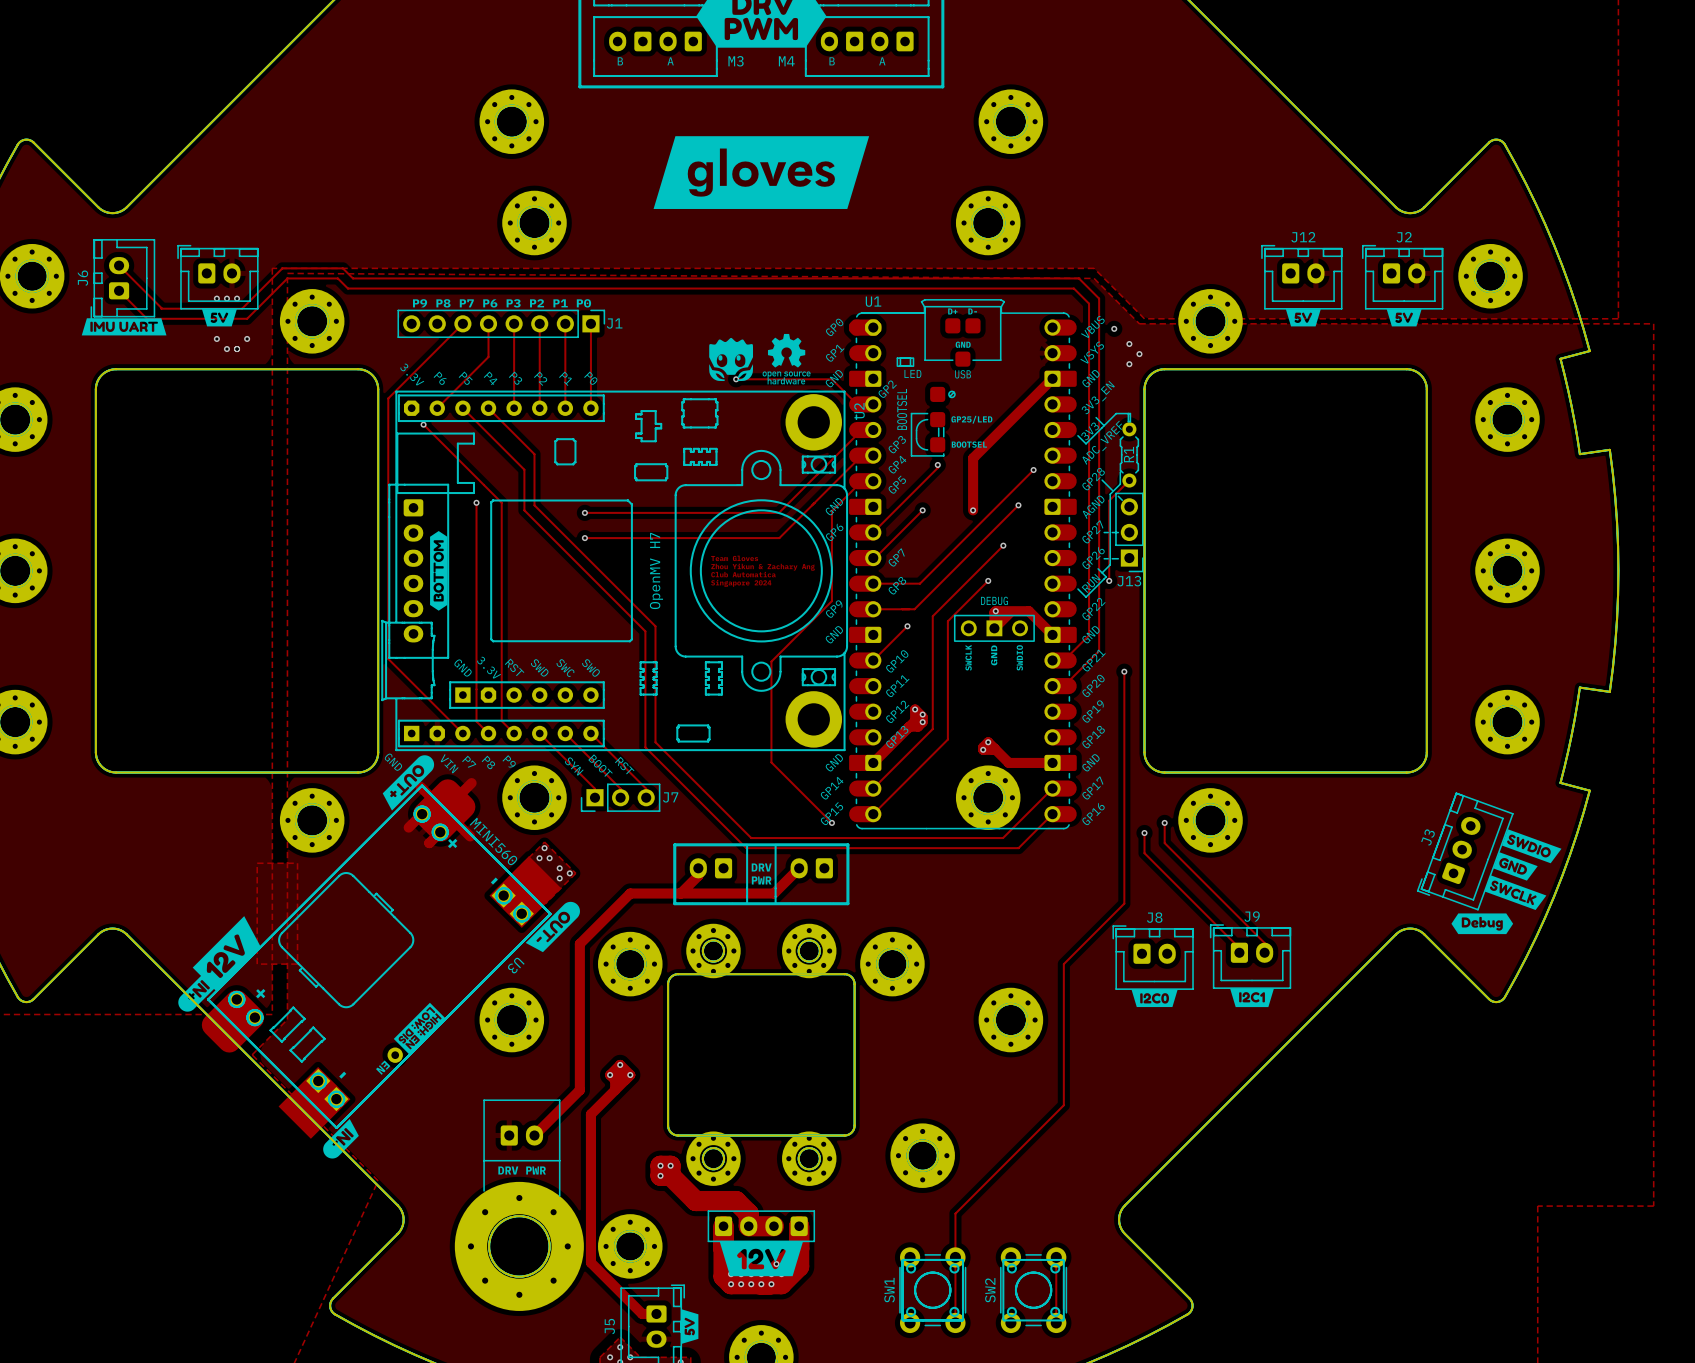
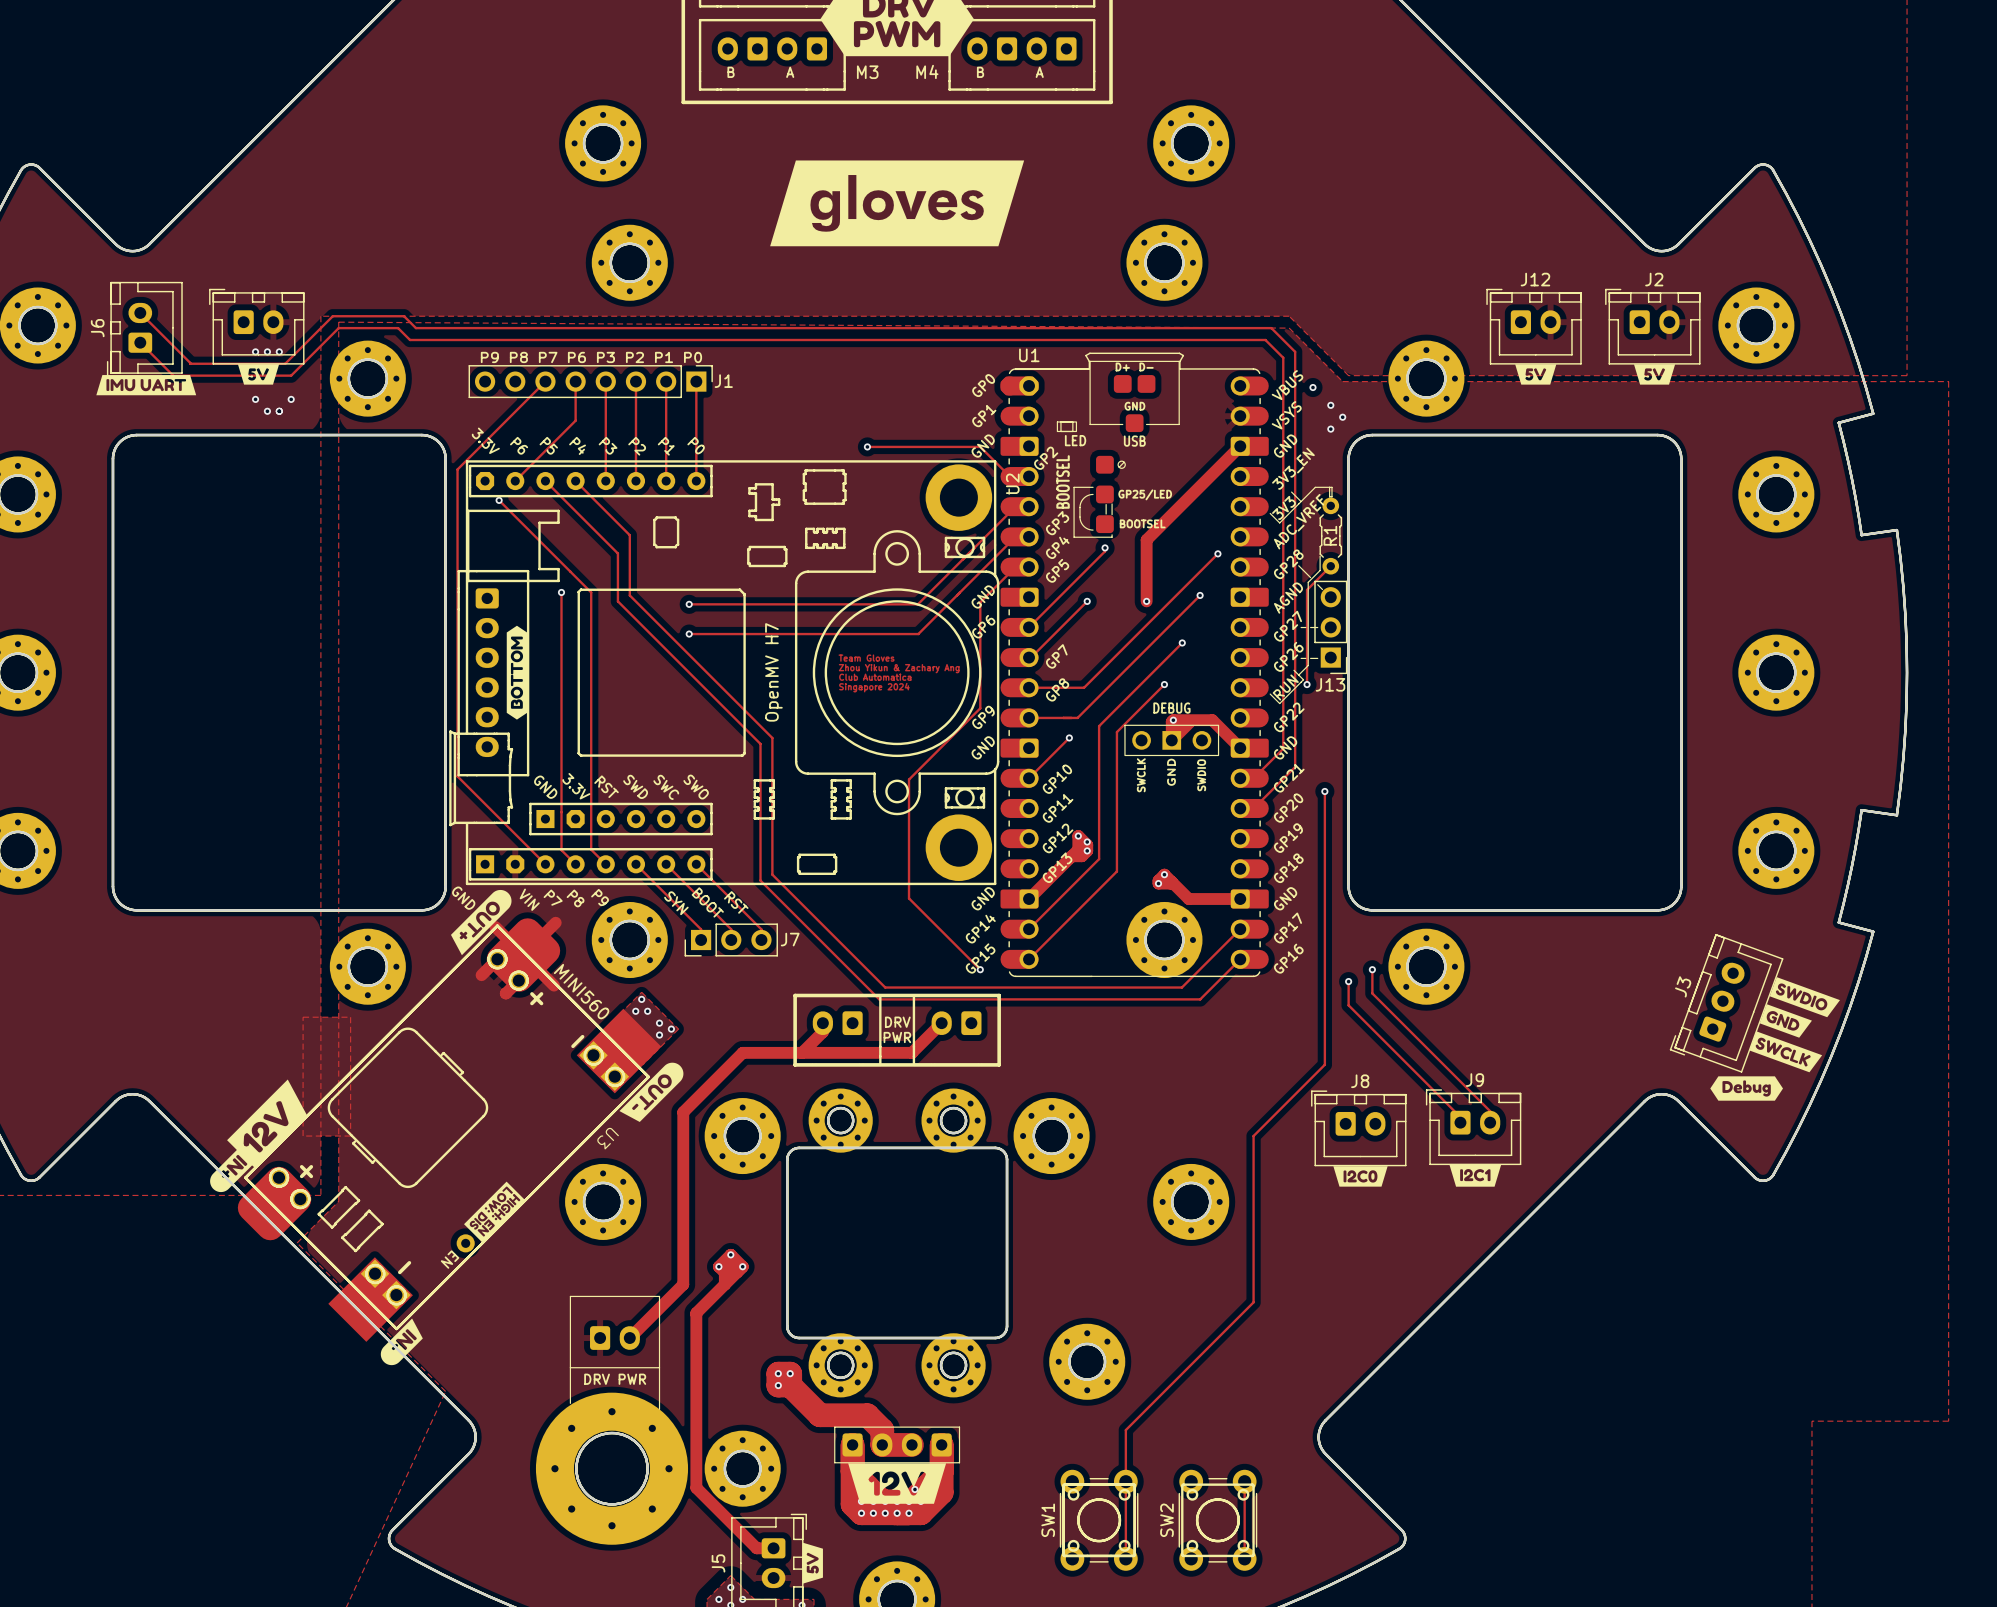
drawing: [709, 333, 811, 385] -> none

